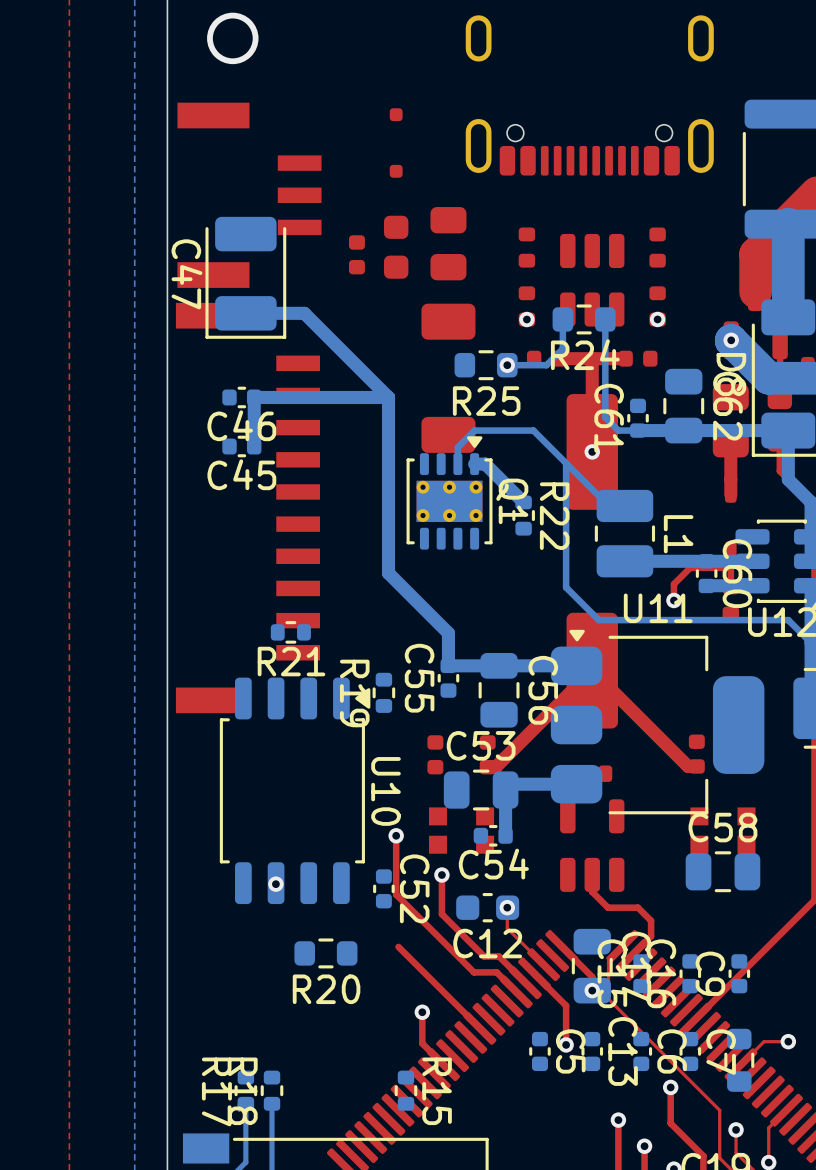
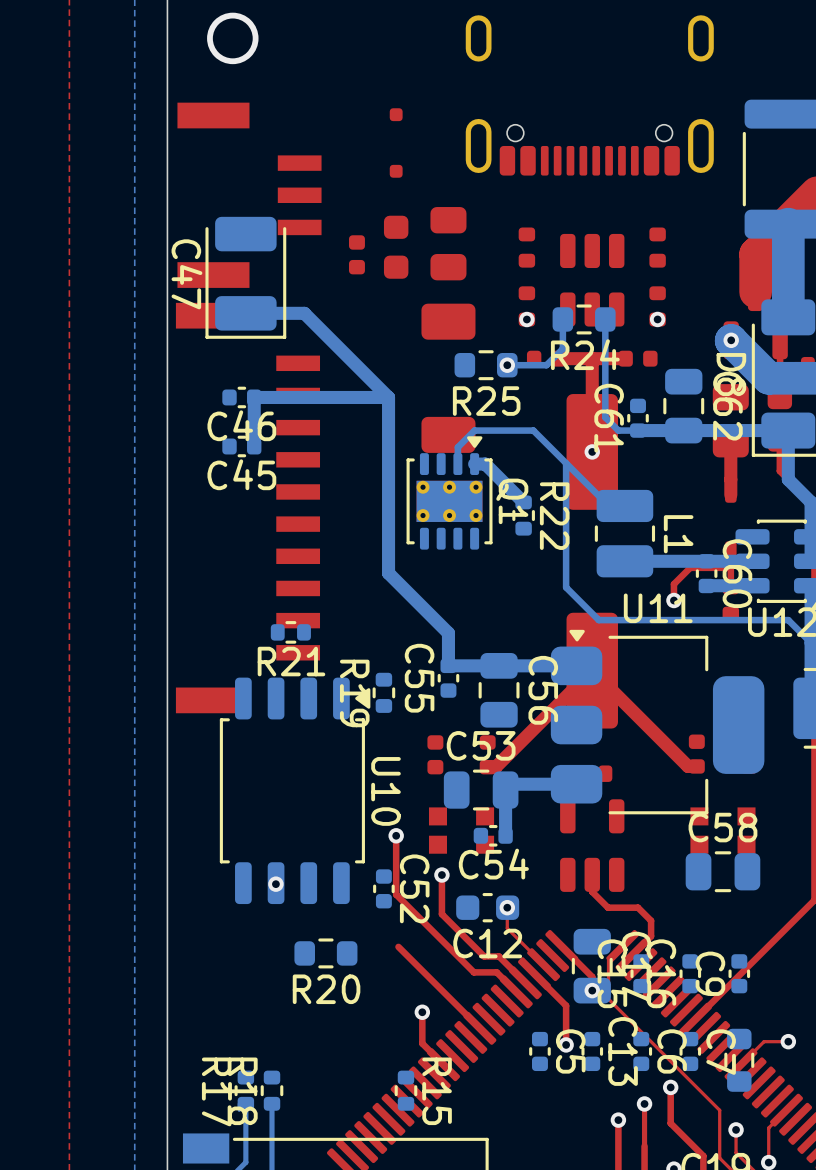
top track: none -> (644, 1103) (644, 1146)
via position: (644, 1146) -> (644, 1103)

